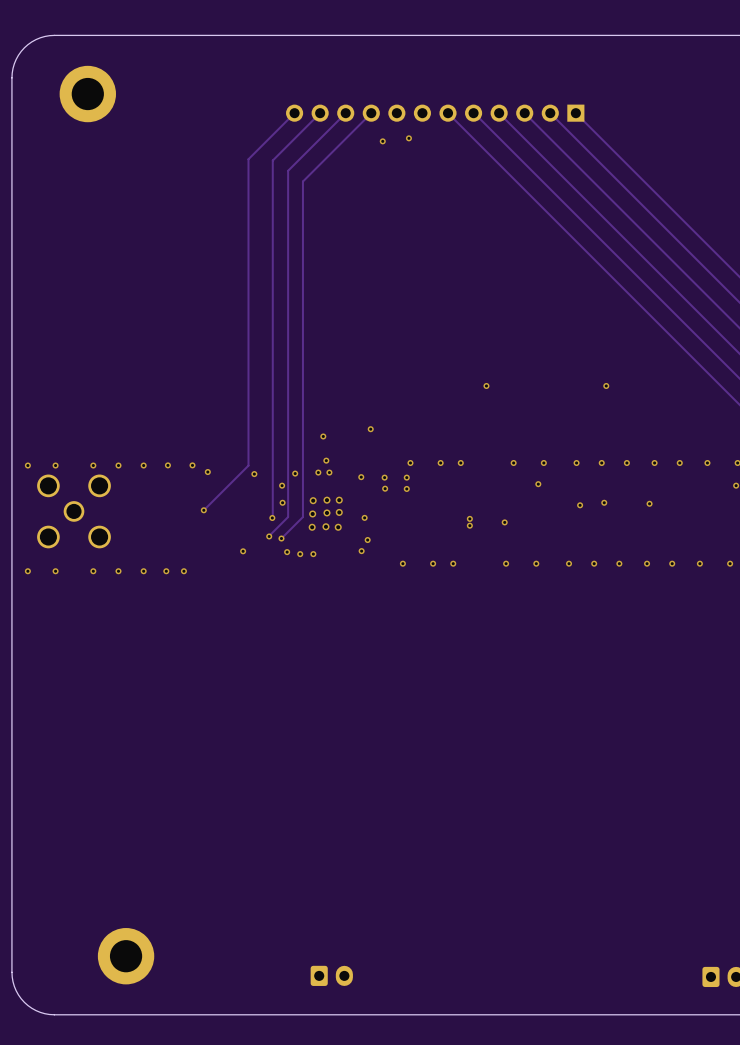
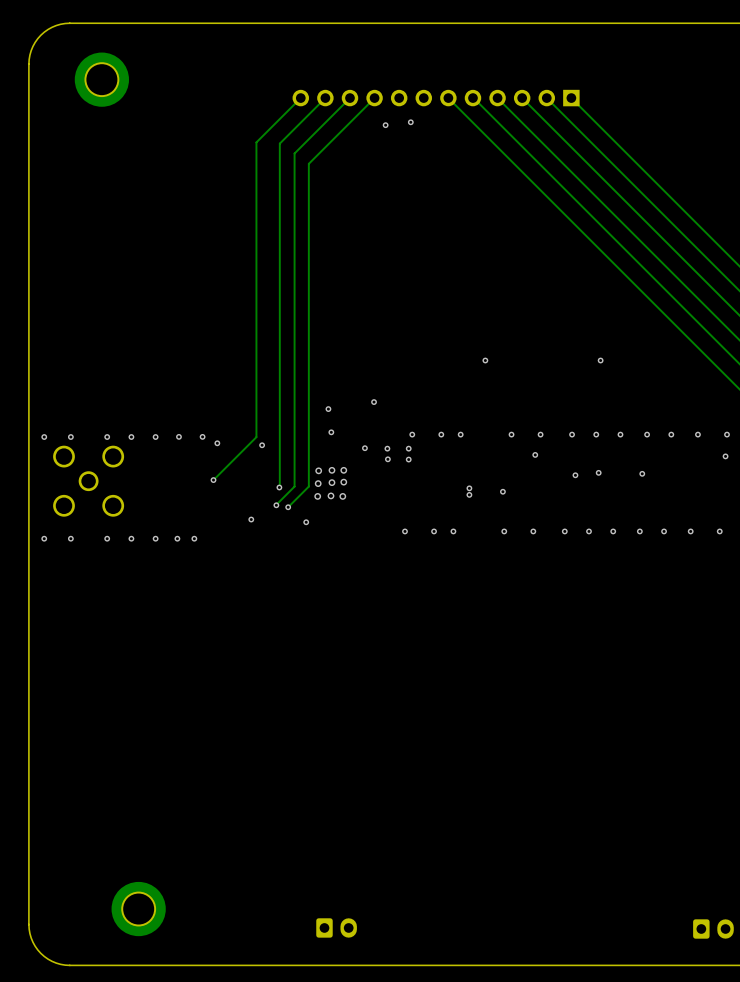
via: (318, 472) -> none
via: (329, 472) -> none
via: (295, 473) -> none
via: (282, 485) -> none
via: (282, 502) -> none
via: (364, 517) -> none
via: (367, 540) -> none
via: (361, 551) -> none
via: (287, 552) -> none
via: (313, 554) -> none

